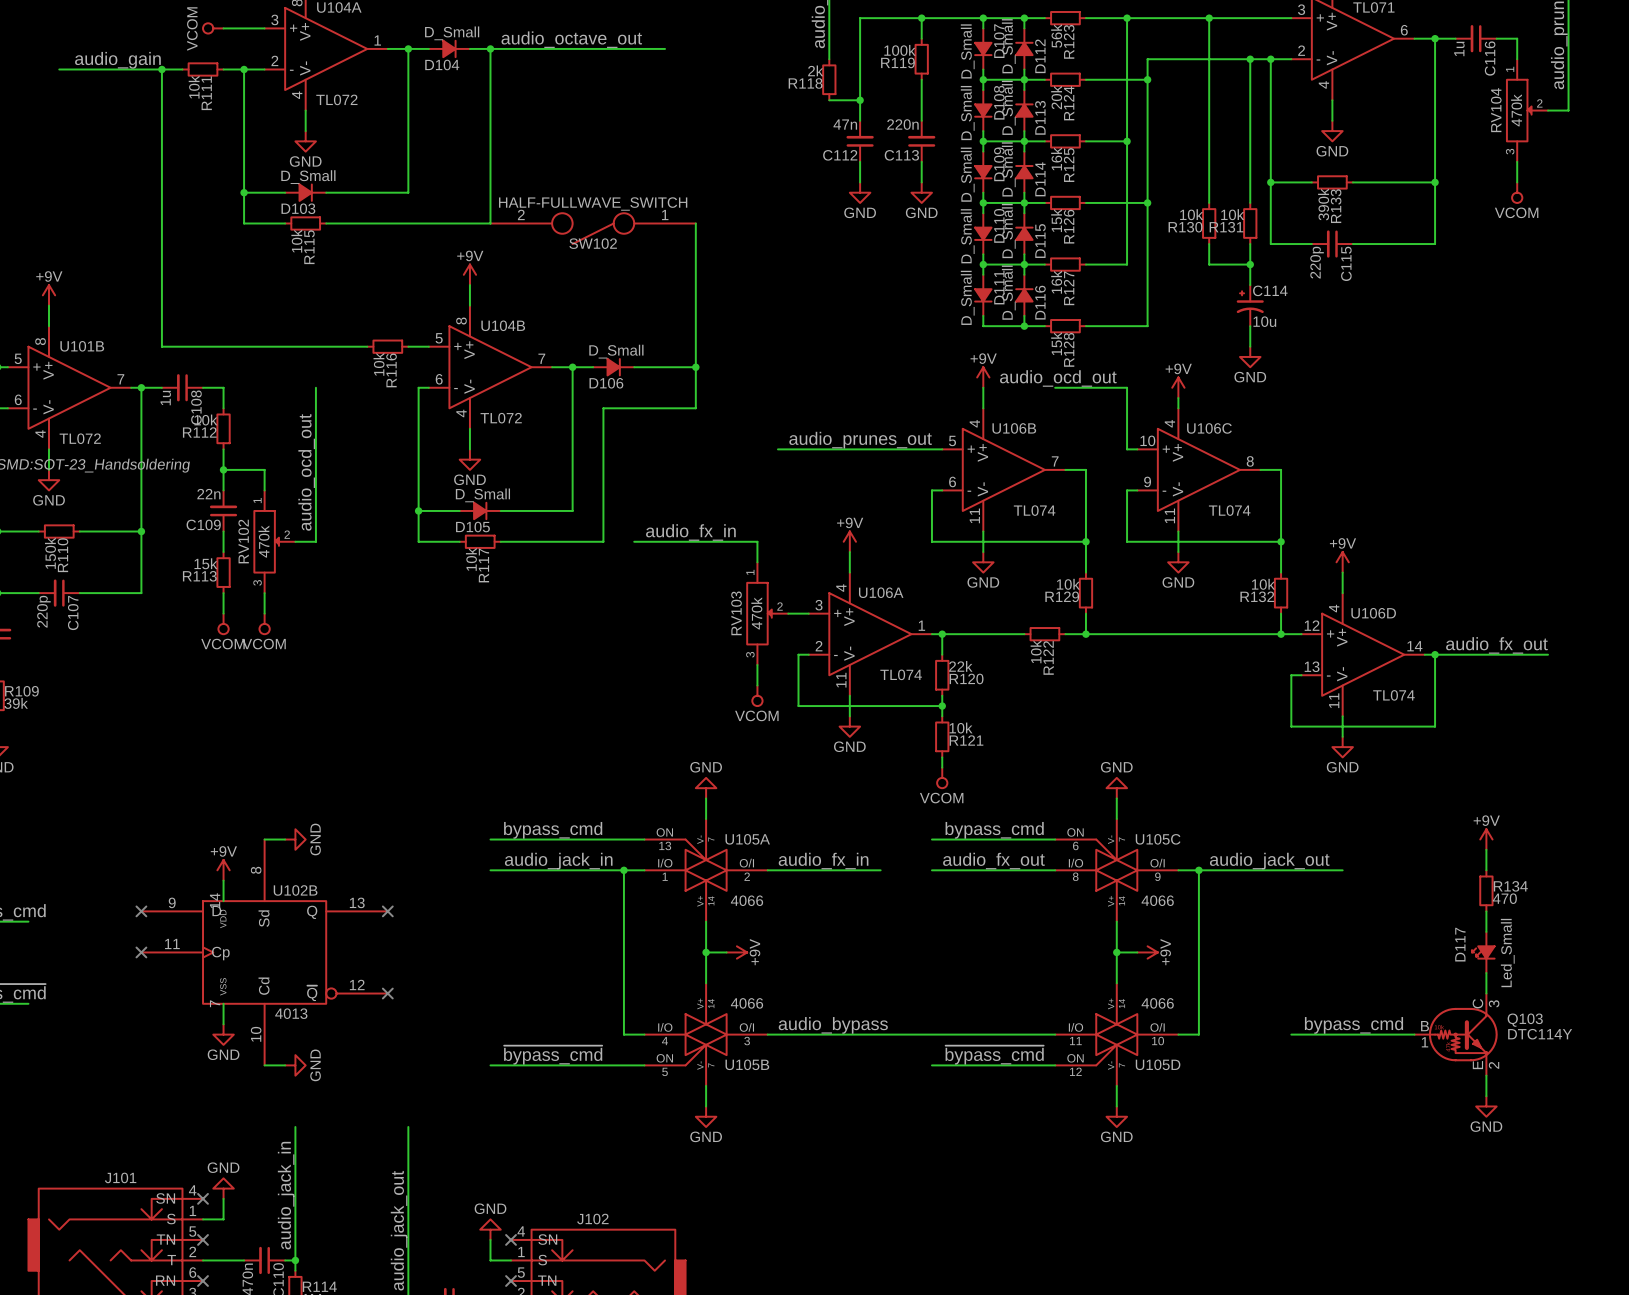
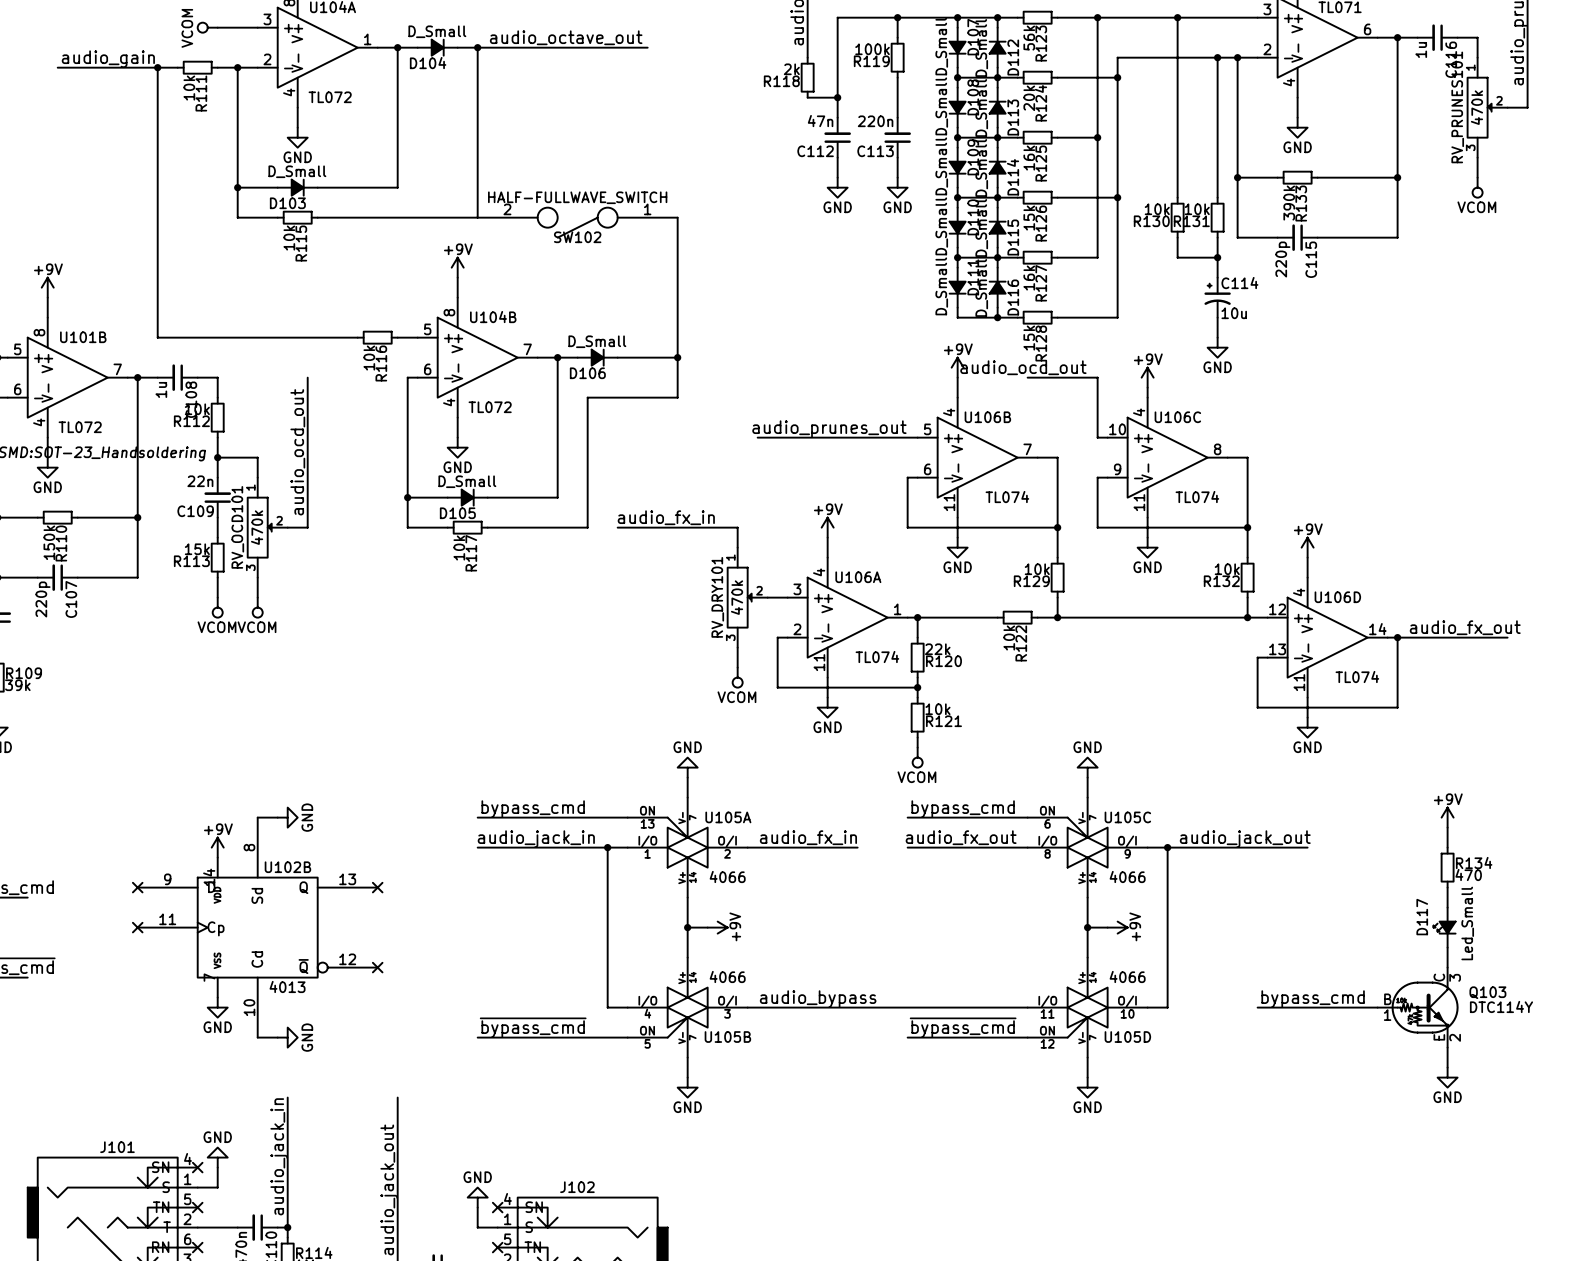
RV104 name: RV104 (1496, 110) -> RV_PRUNES101 (1457, 107)
RV102 name: RV102 (243, 541) -> RV_OCD101 (237, 527)
RV103 name: RV103 (736, 613) -> RV_DRY101 (717, 597)

